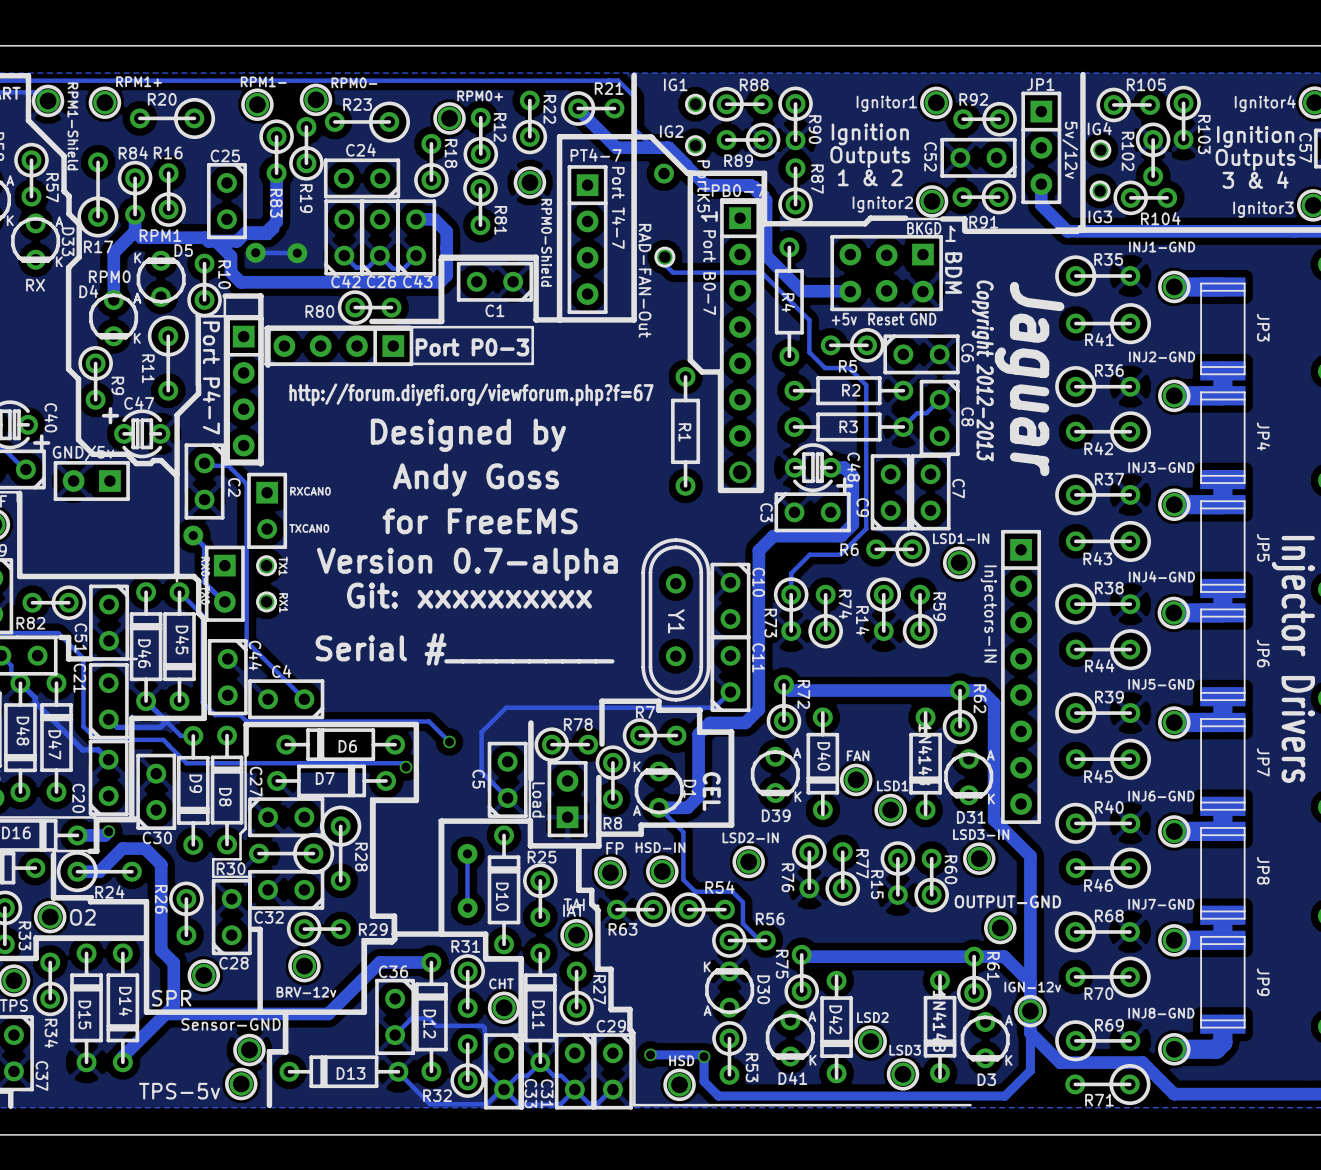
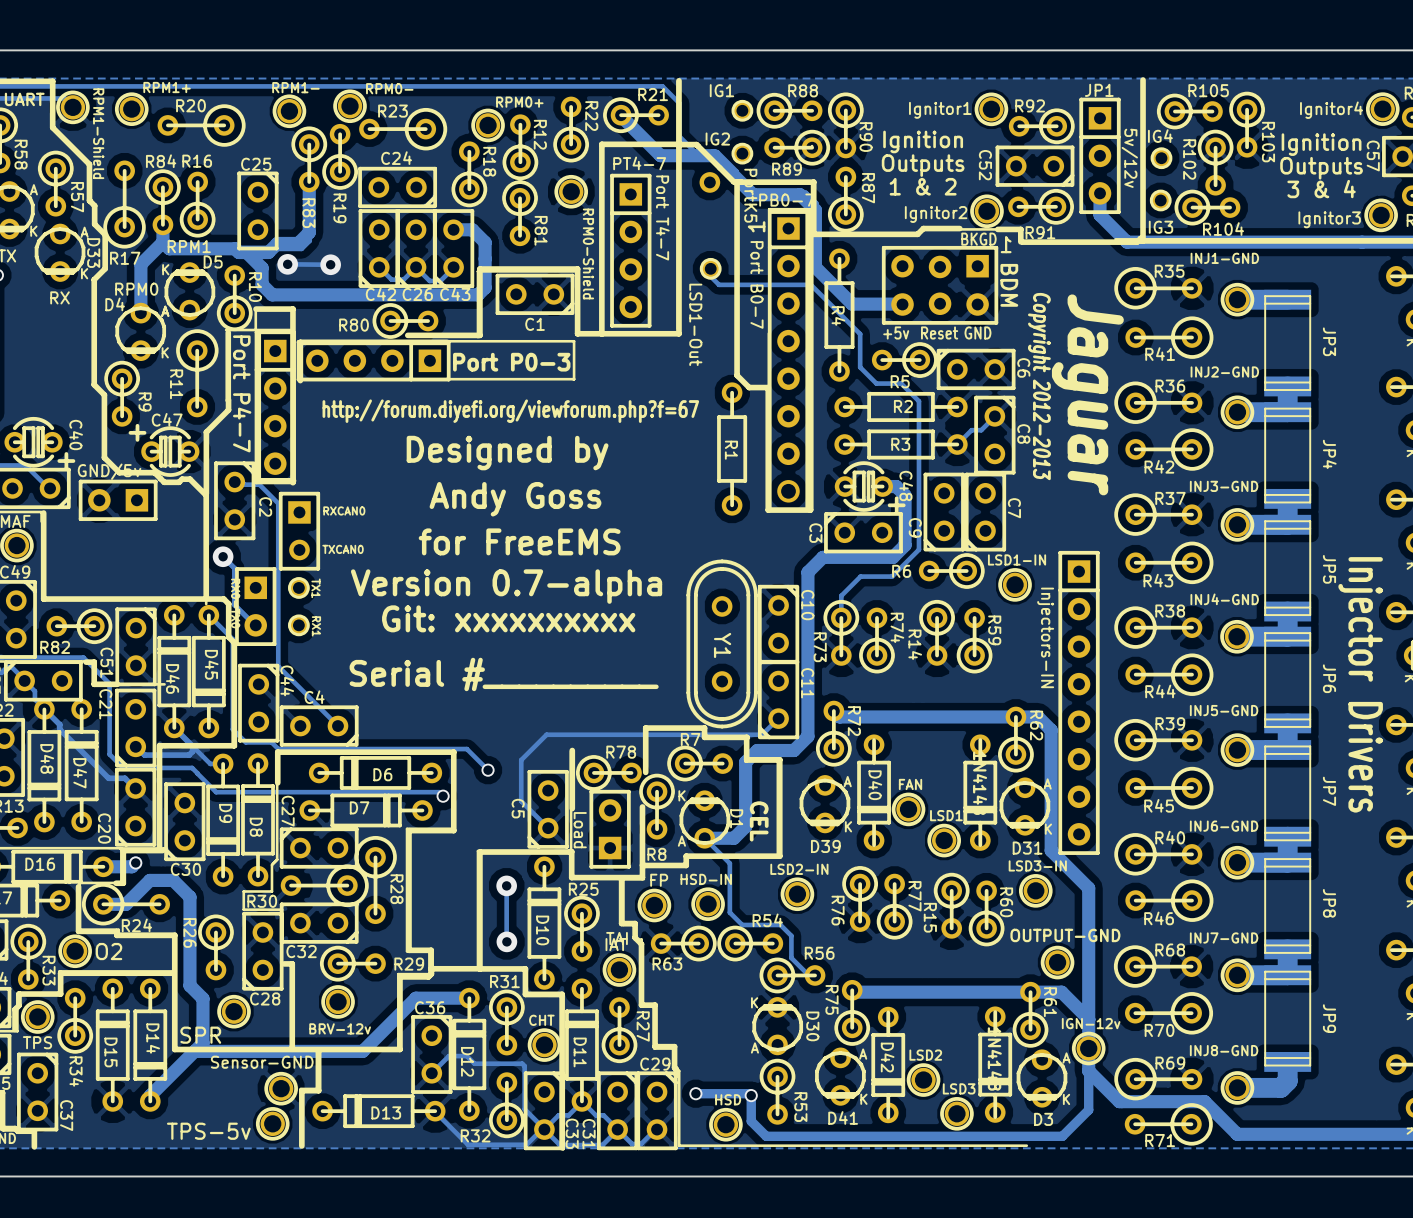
part value: RAD-FAN-Out (645, 280) -> LSD1-Out (695, 324)

